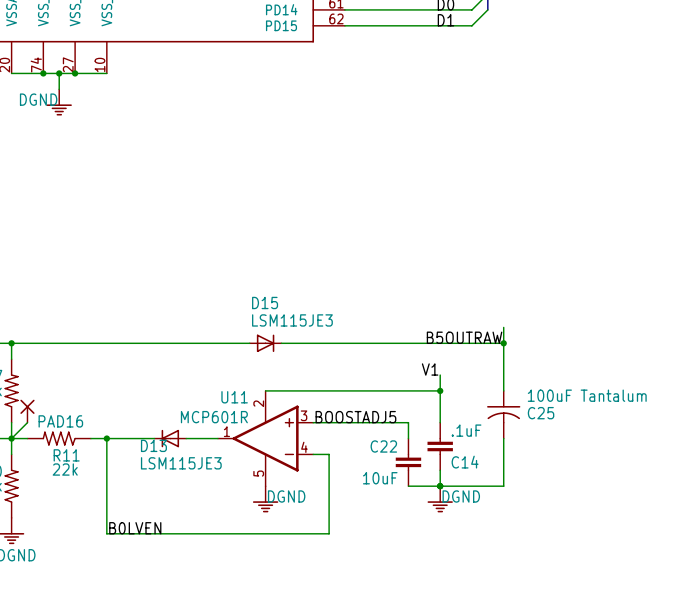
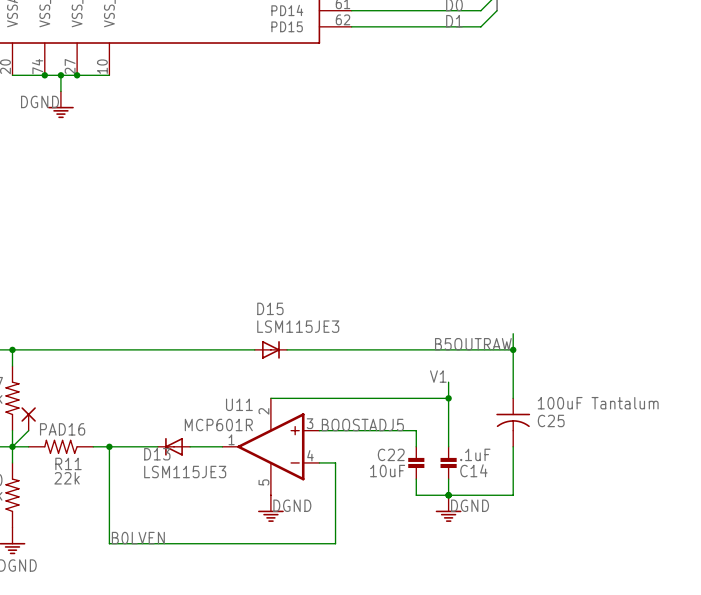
C14 symbol: [427, 422, 453, 471] -> [440, 446, 457, 480]
C22 symbol: [395, 438, 422, 487] -> [408, 446, 425, 480]

